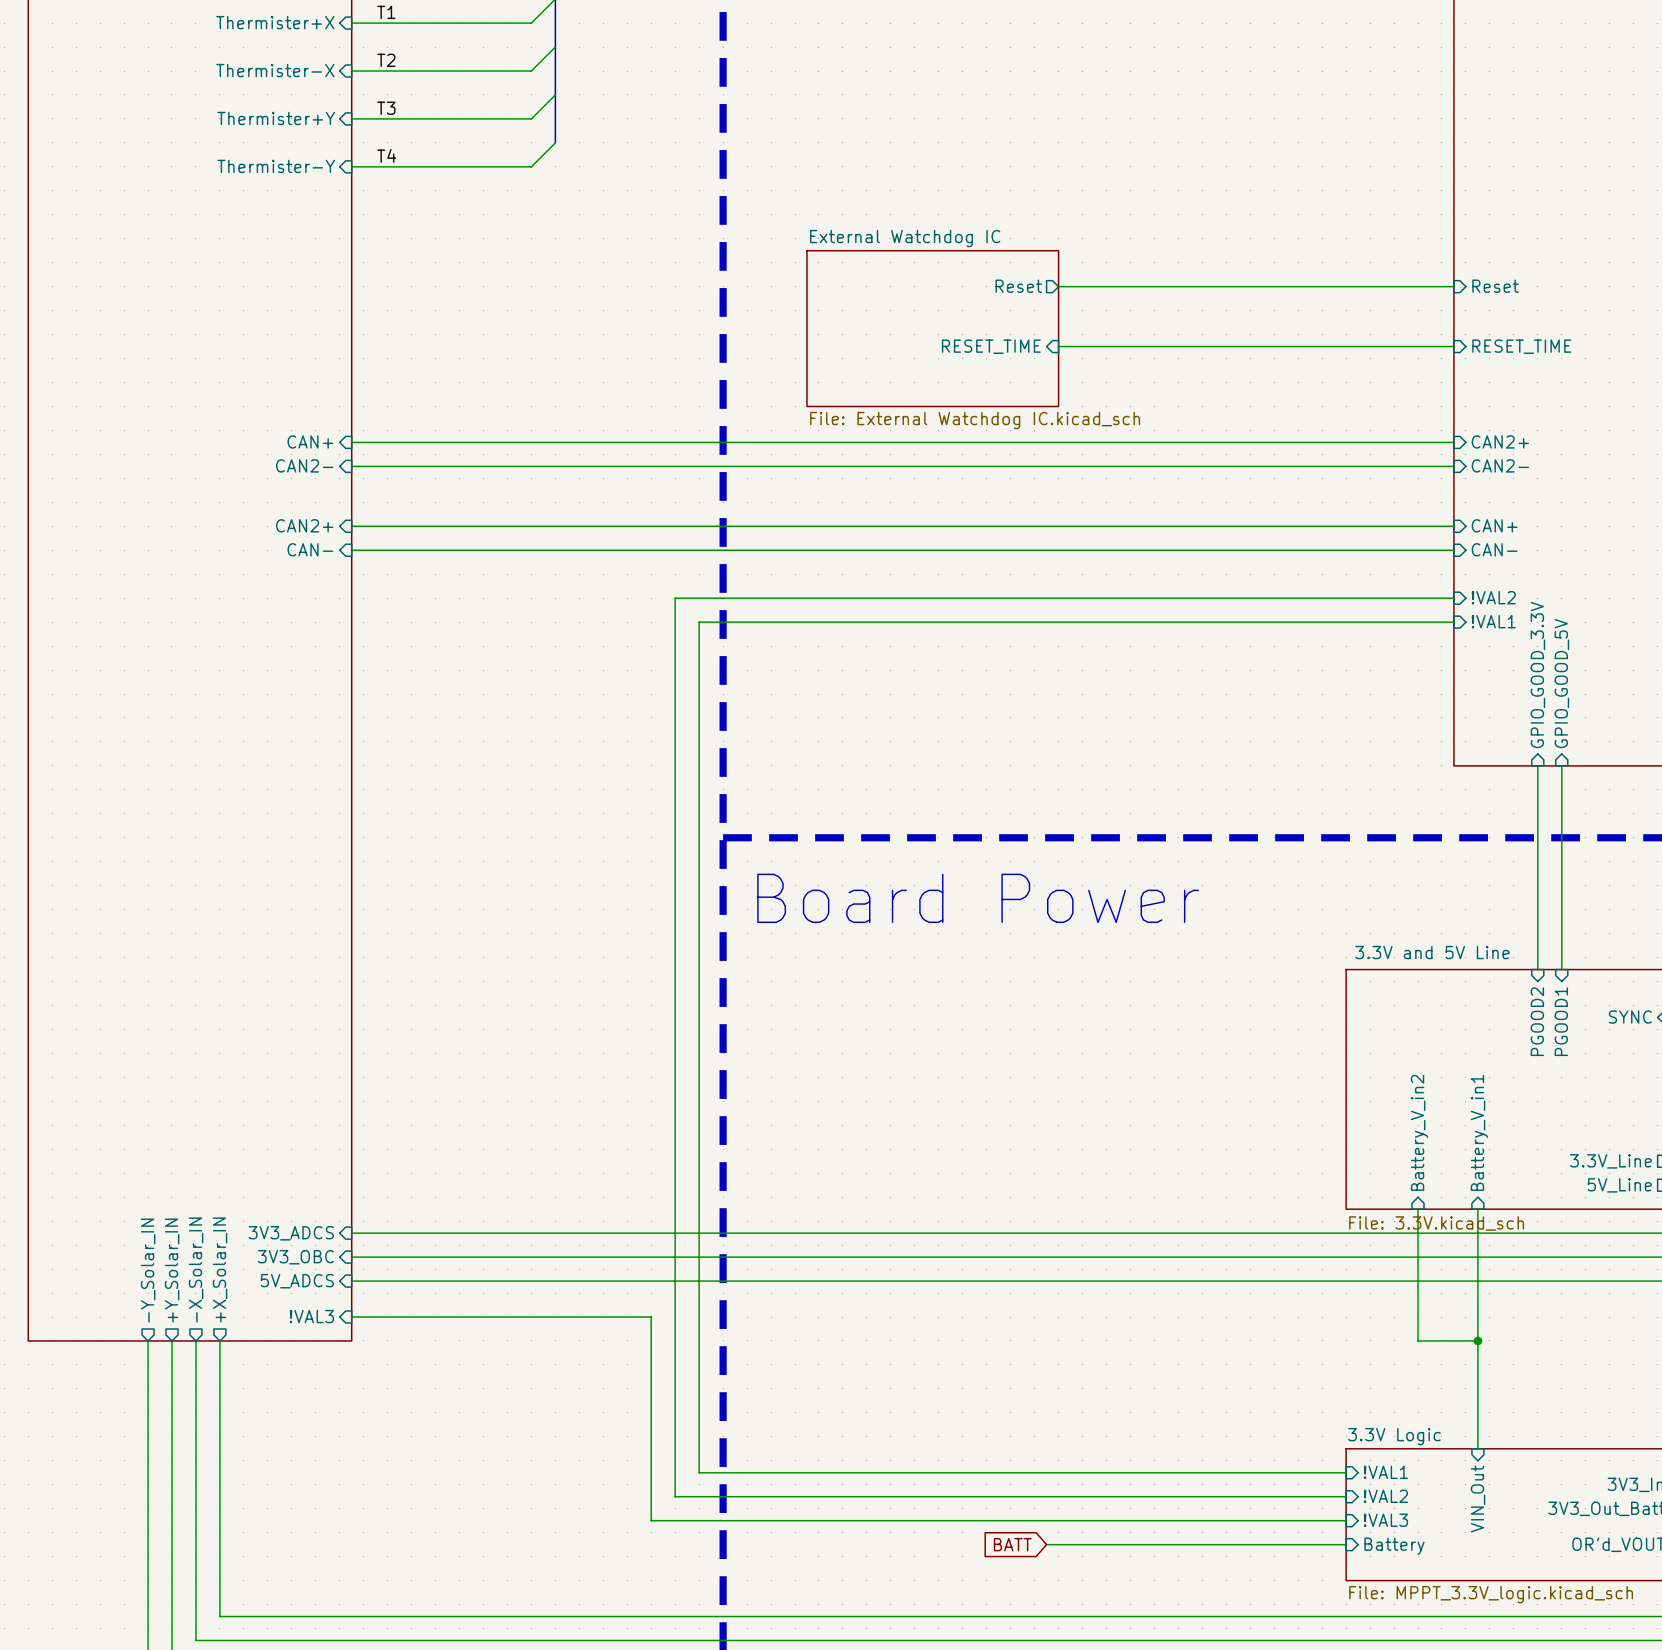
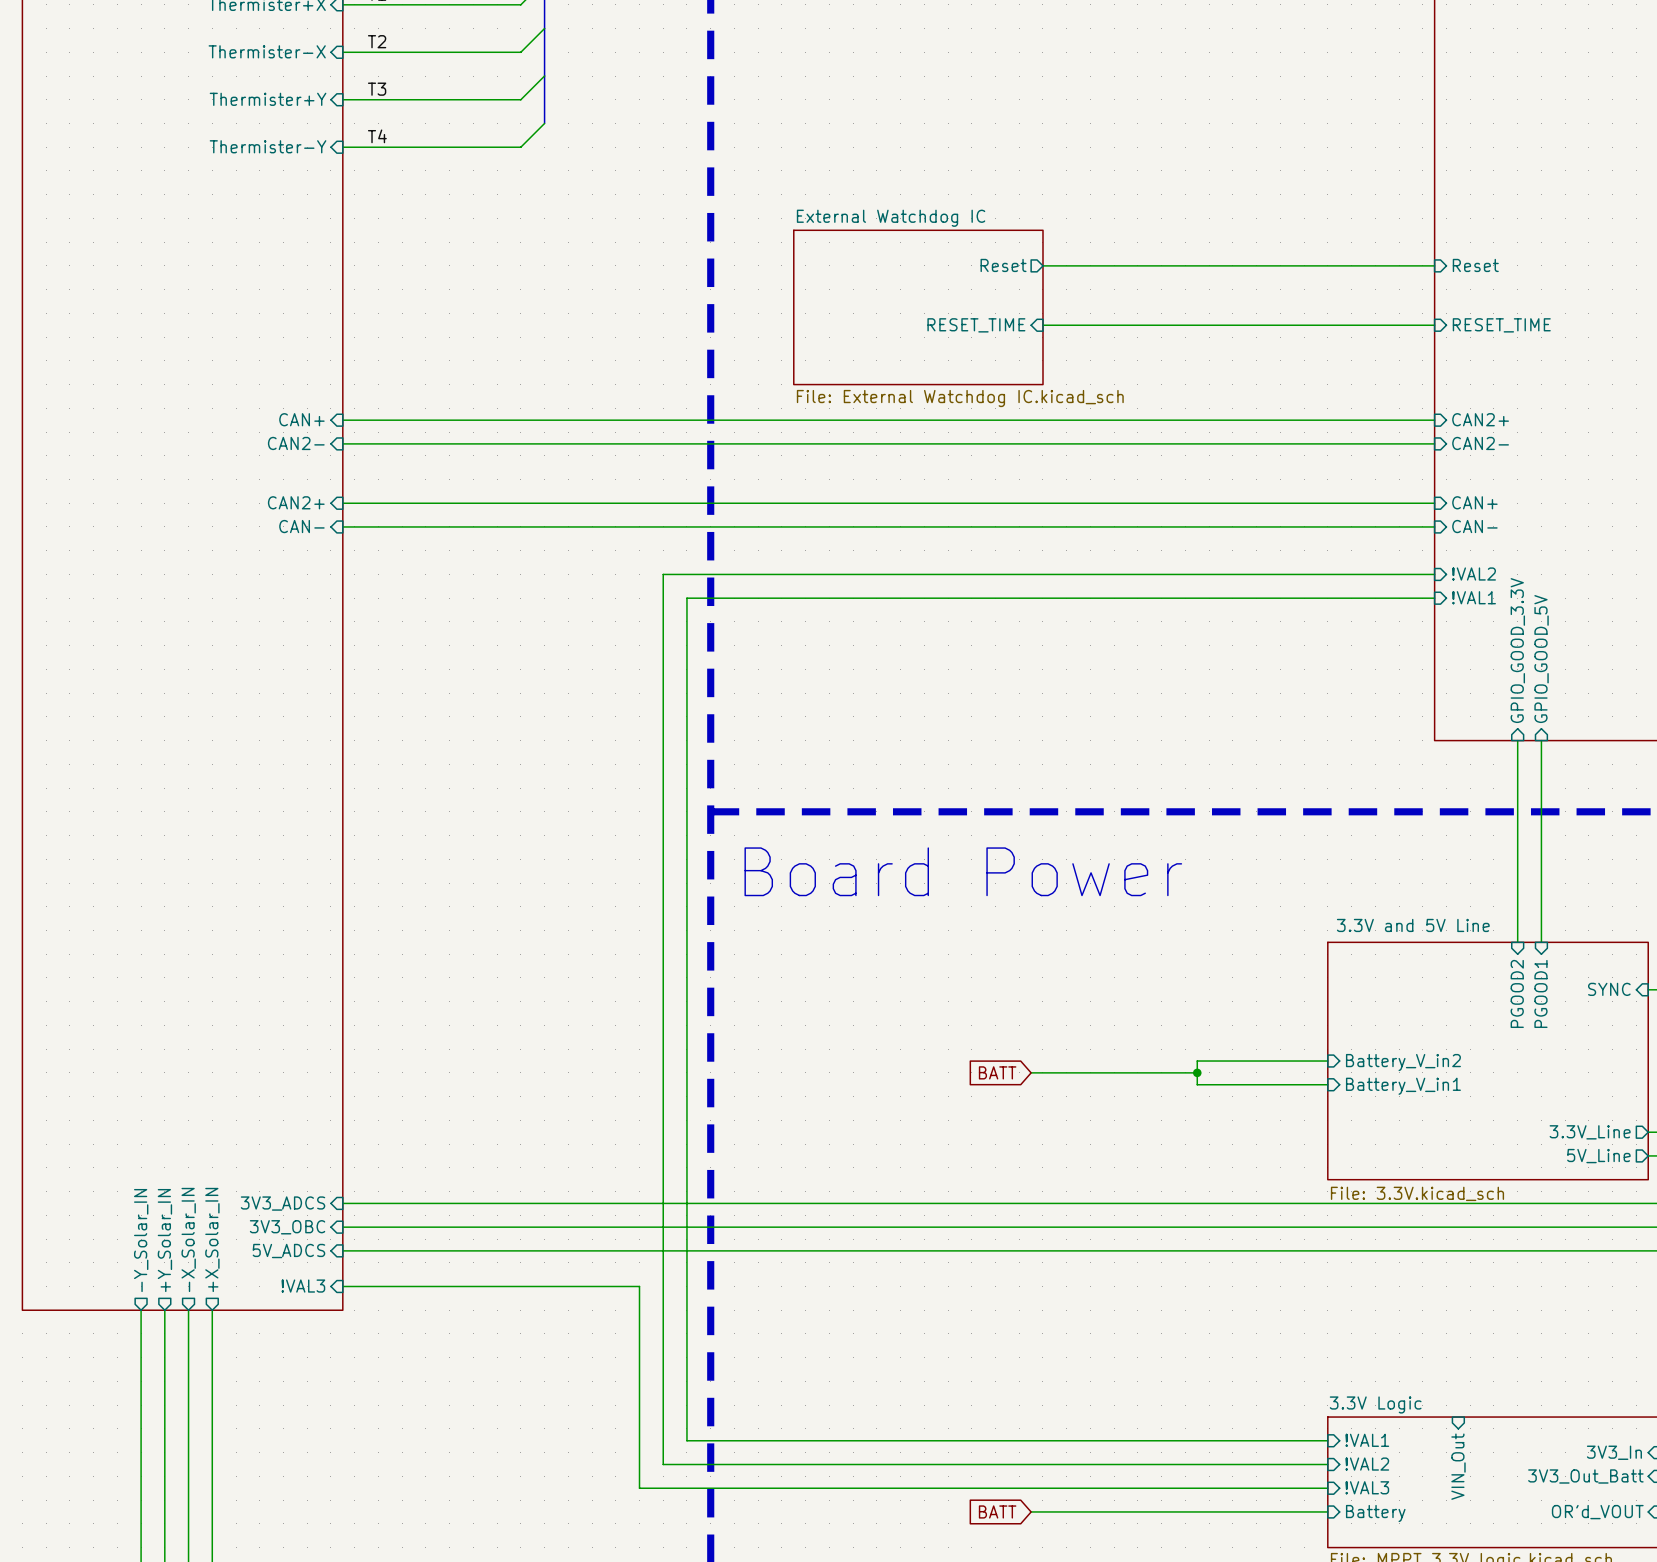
wire: none -> (1327, 1061) (1197, 1061) (1197, 1084) (1327, 1084)
global label: none -> BATT (997, 1072)
wire: none -> (1031, 1072) (1197, 1072)
junction: none -> (1197, 1072)
sheet pin rotation: 0° (1419, 1132) -> 90° clockwise (1403, 1062)
sheet pin rotation: 0° (1479, 1132) -> 90° clockwise (1403, 1086)
wire: (1418, 1209) (1418, 1340) (1477, 1340) -> none
wire: (1477, 1209) (1477, 1448) -> none
junction: (1477, 1340) -> none

